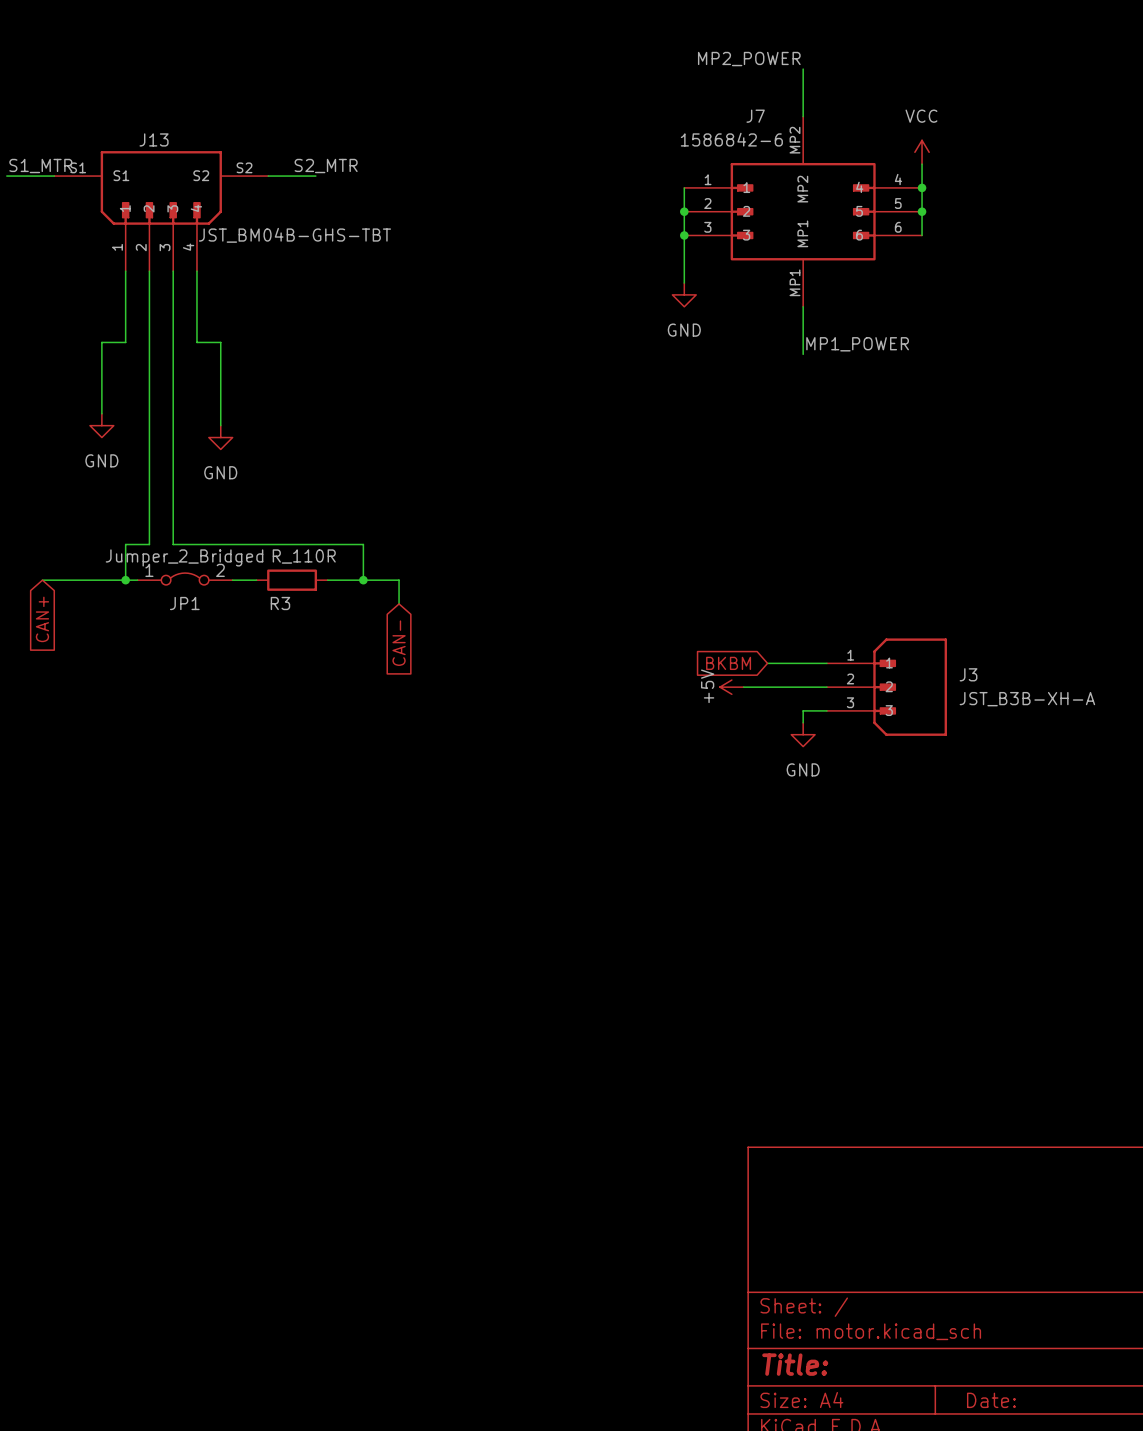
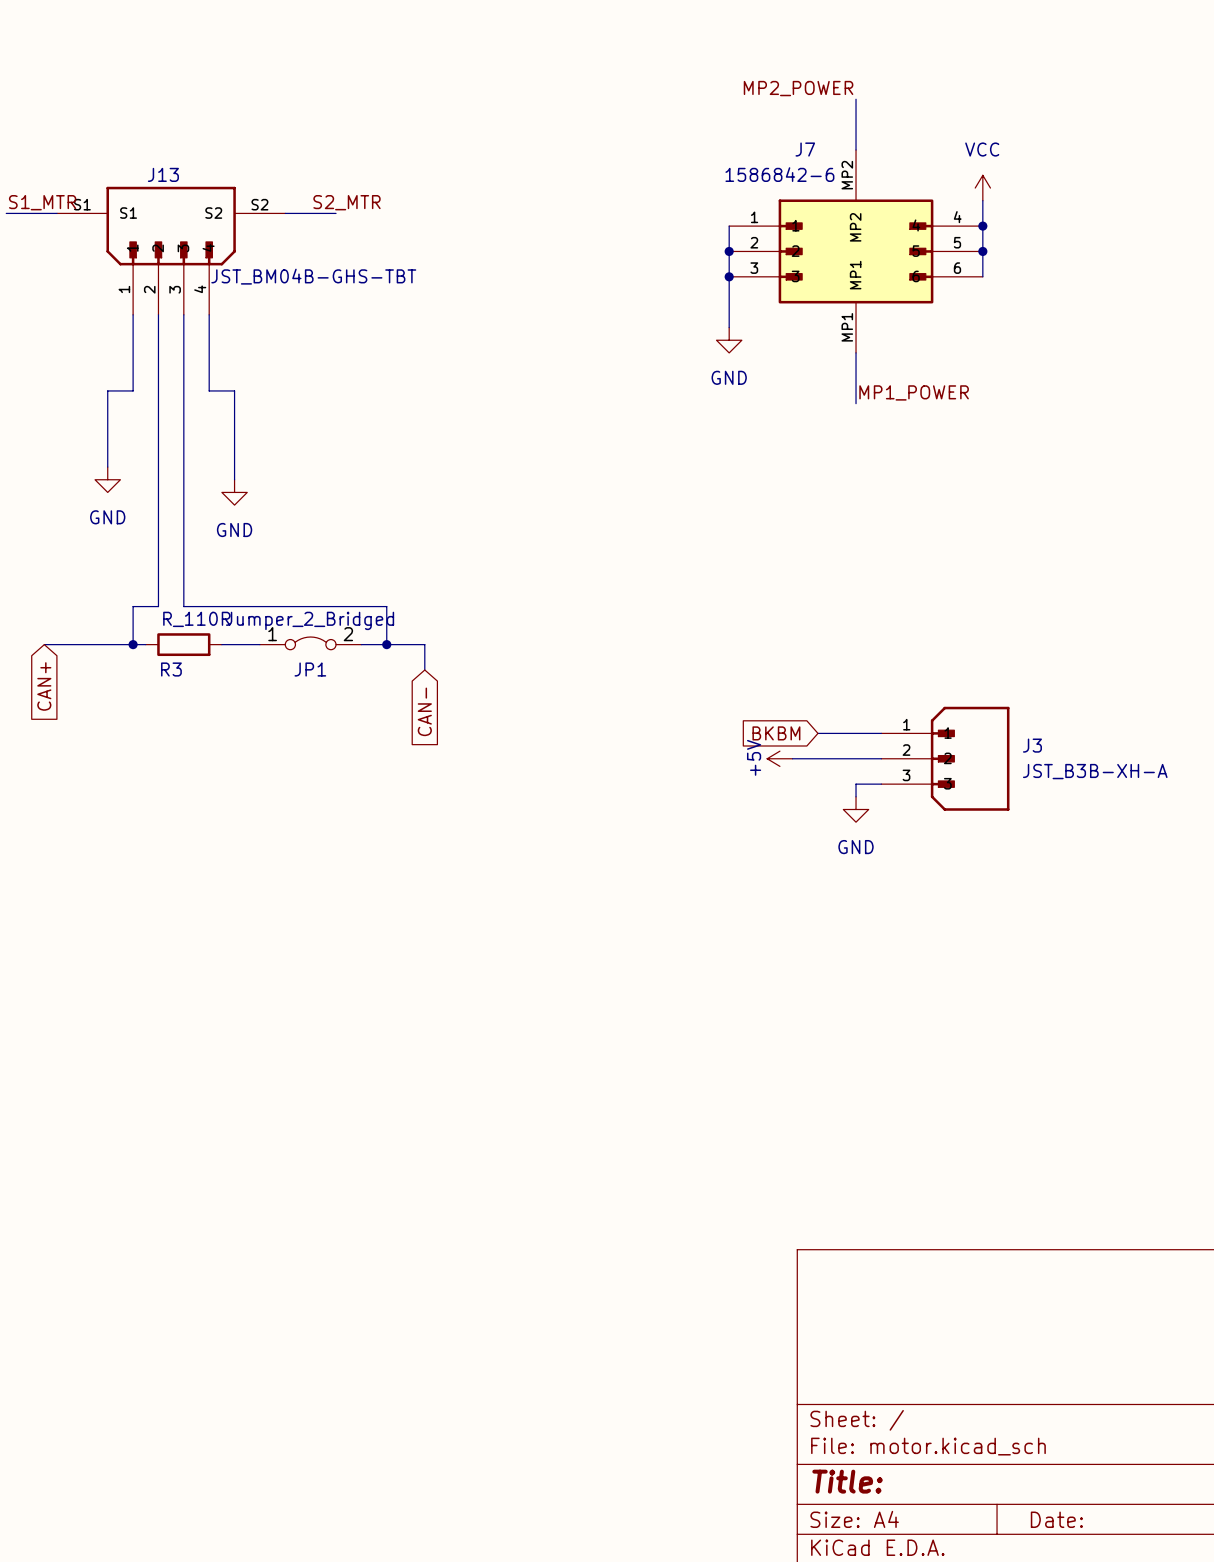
JP1 position: (185, 578) -> (310, 643)
R3 position: (292, 580) -> (183, 644)

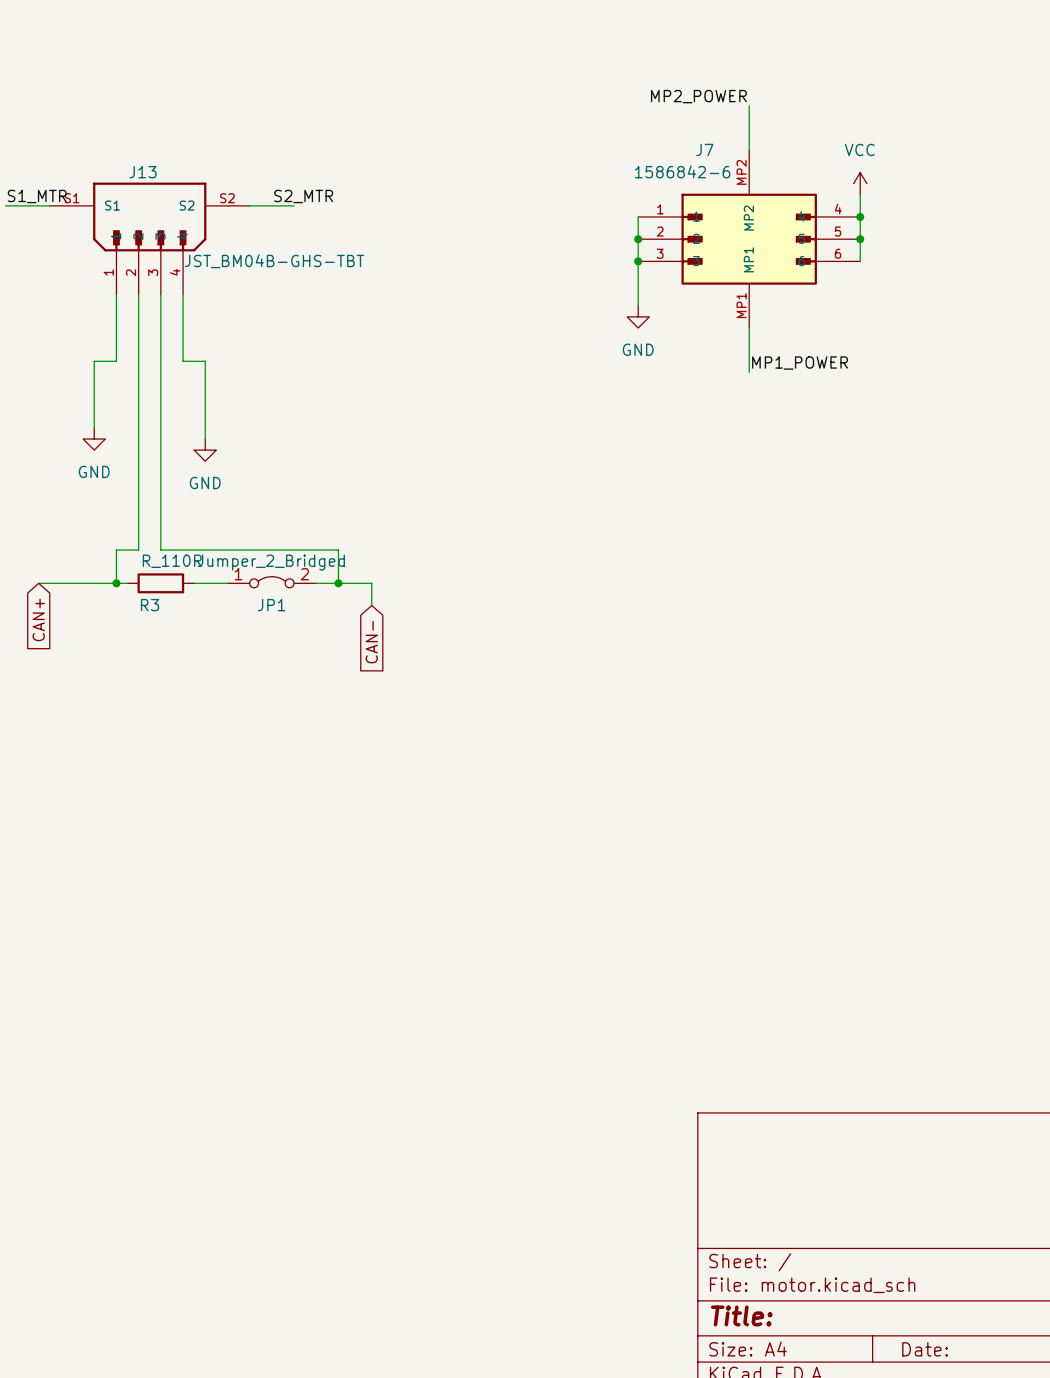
global label: BKBM (776, 733) -> none
wire: (817, 733) (881, 733) -> none
power symbol: +5V (779, 758) -> none
wire: (792, 758) (881, 758) -> none
J3: JST_B3B-XH-A (945, 758) -> none
wire: (881, 784) (856, 784) (856, 796) -> none
power symbol: GND (856, 809) -> none

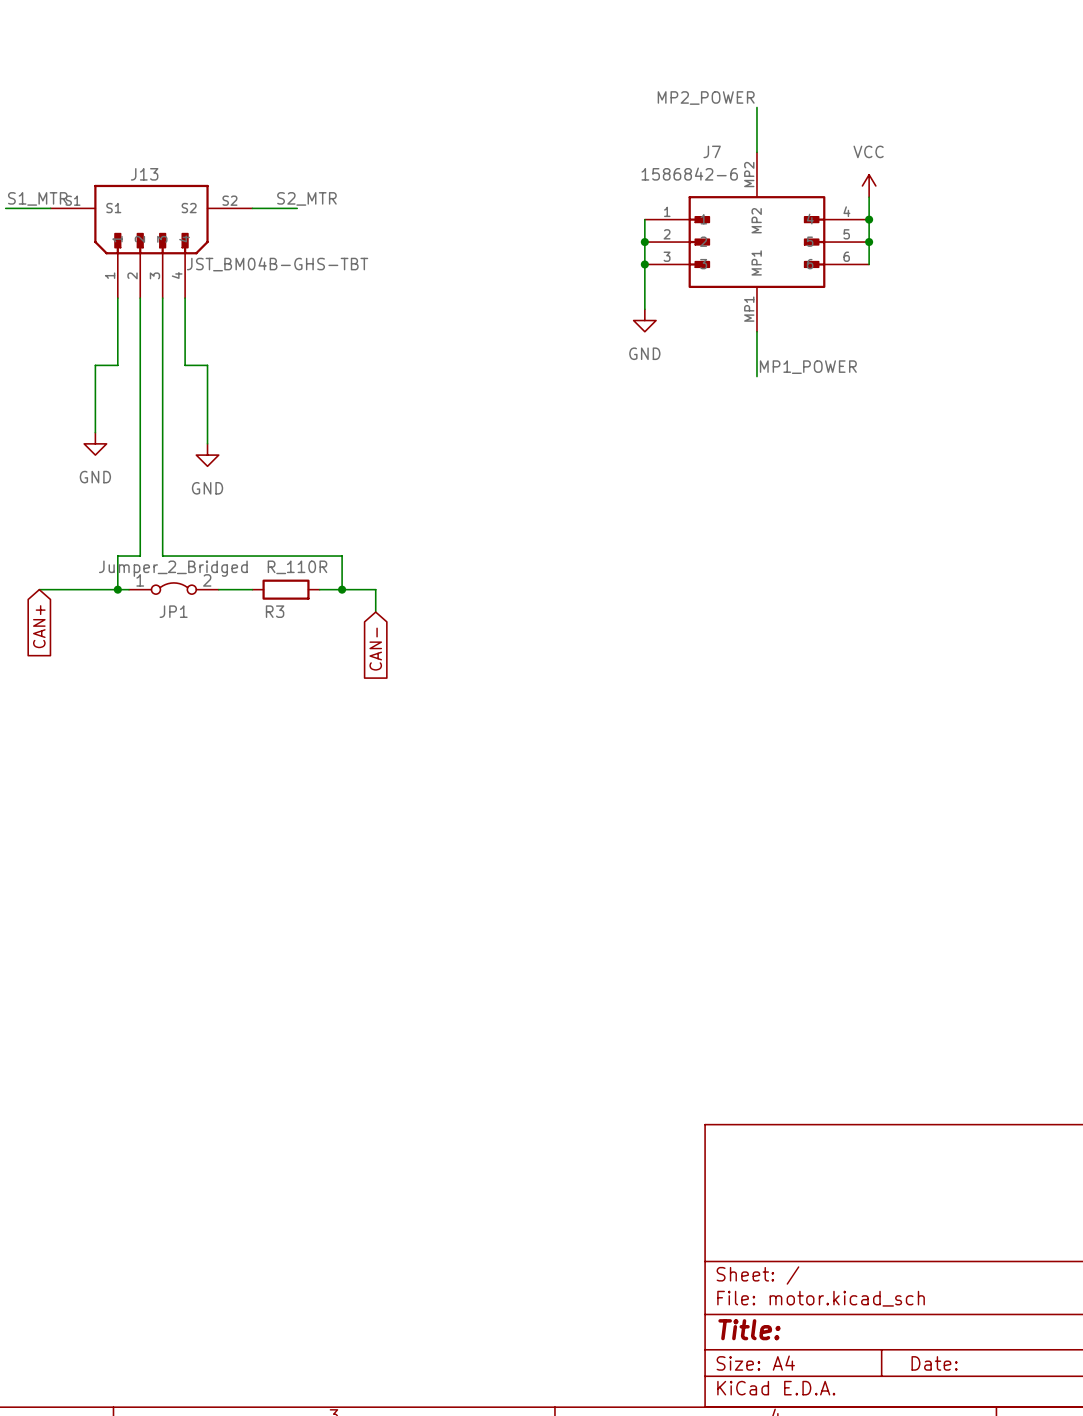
JP1 position: (271, 582) -> (173, 588)
R3 position: (160, 583) -> (286, 589)

